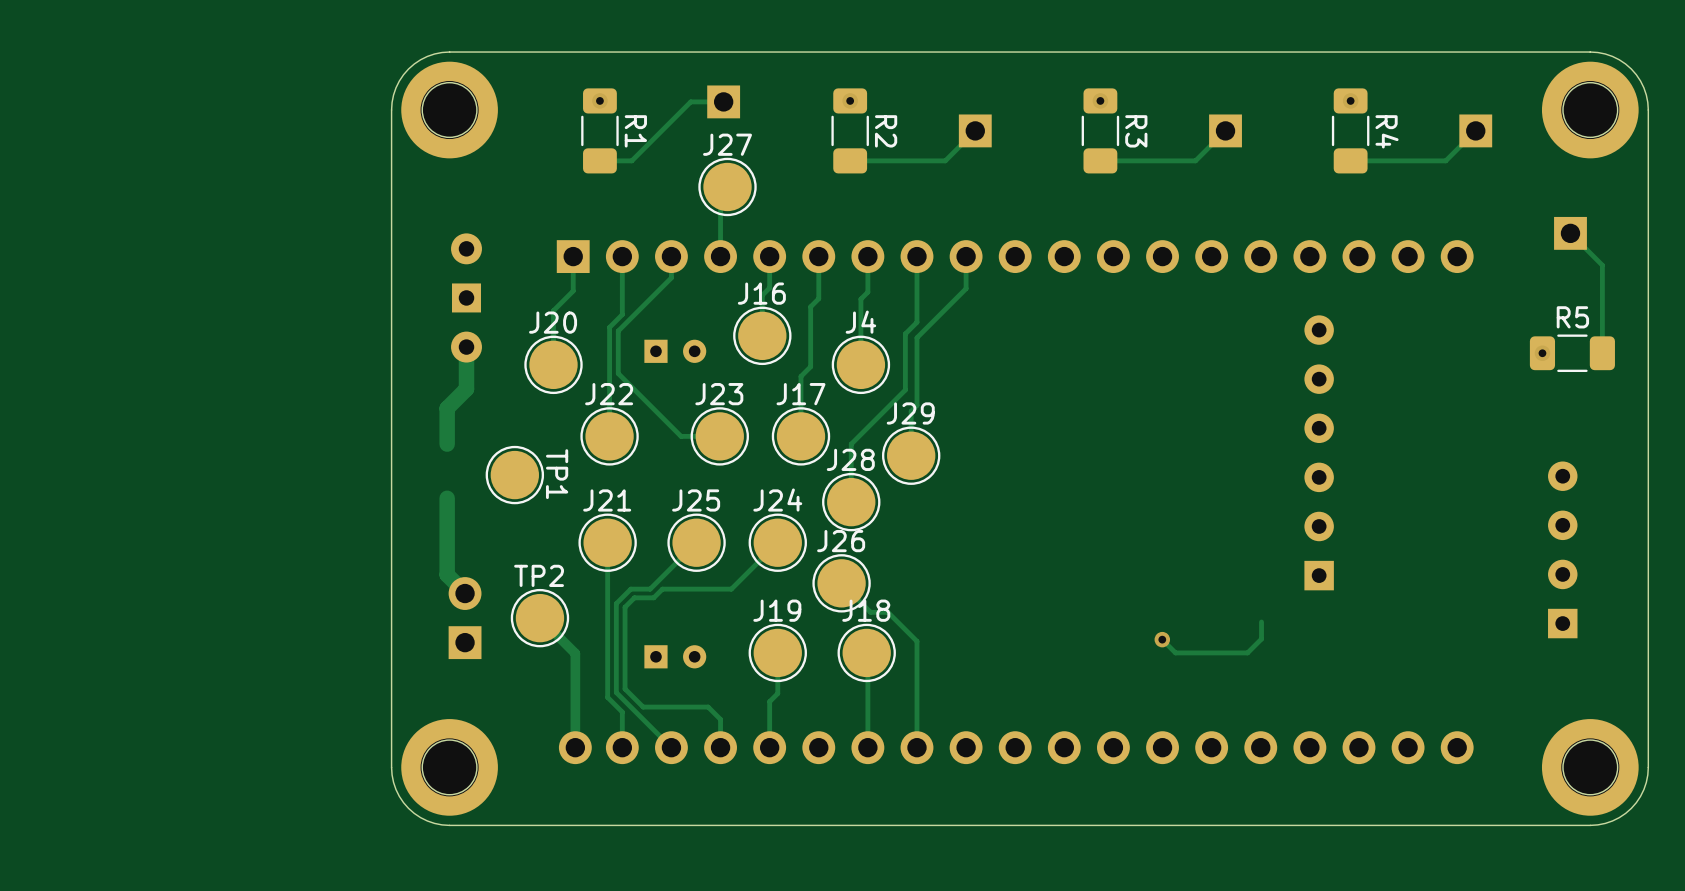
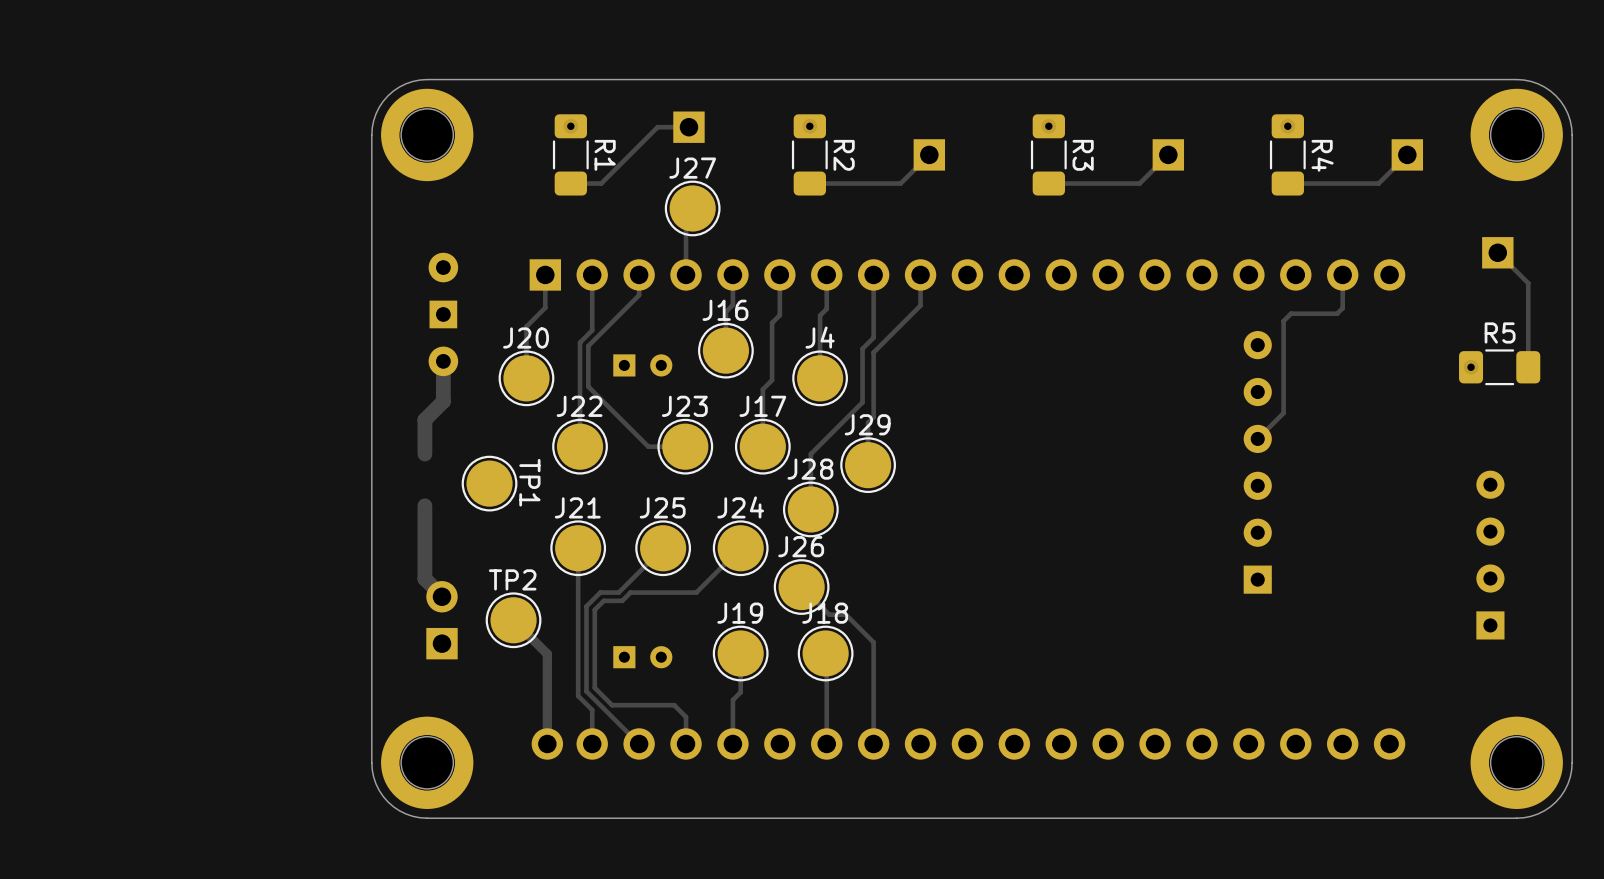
track: none -> (1342, 274) (1342, 308) (1337, 313) (1290, 313) (1283, 321) (1283, 413) (1257, 438)
track: (1261, 622) (1261, 639) (1247, 652) (1175, 652) (1162, 639) -> none
via: (1162, 639) -> none

